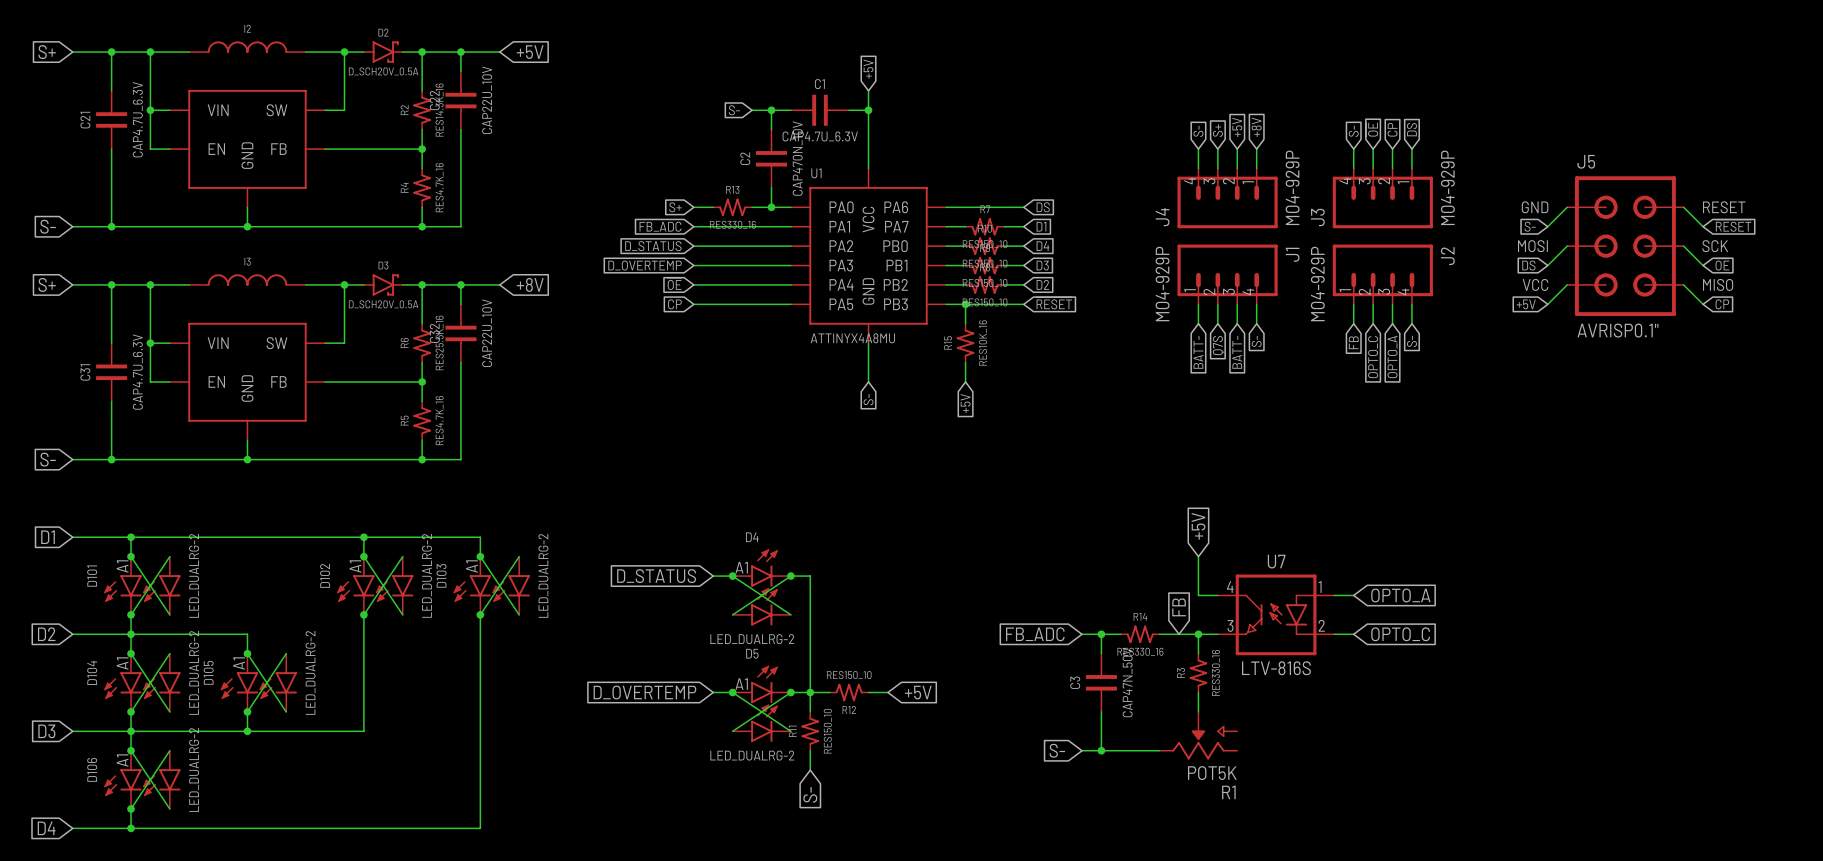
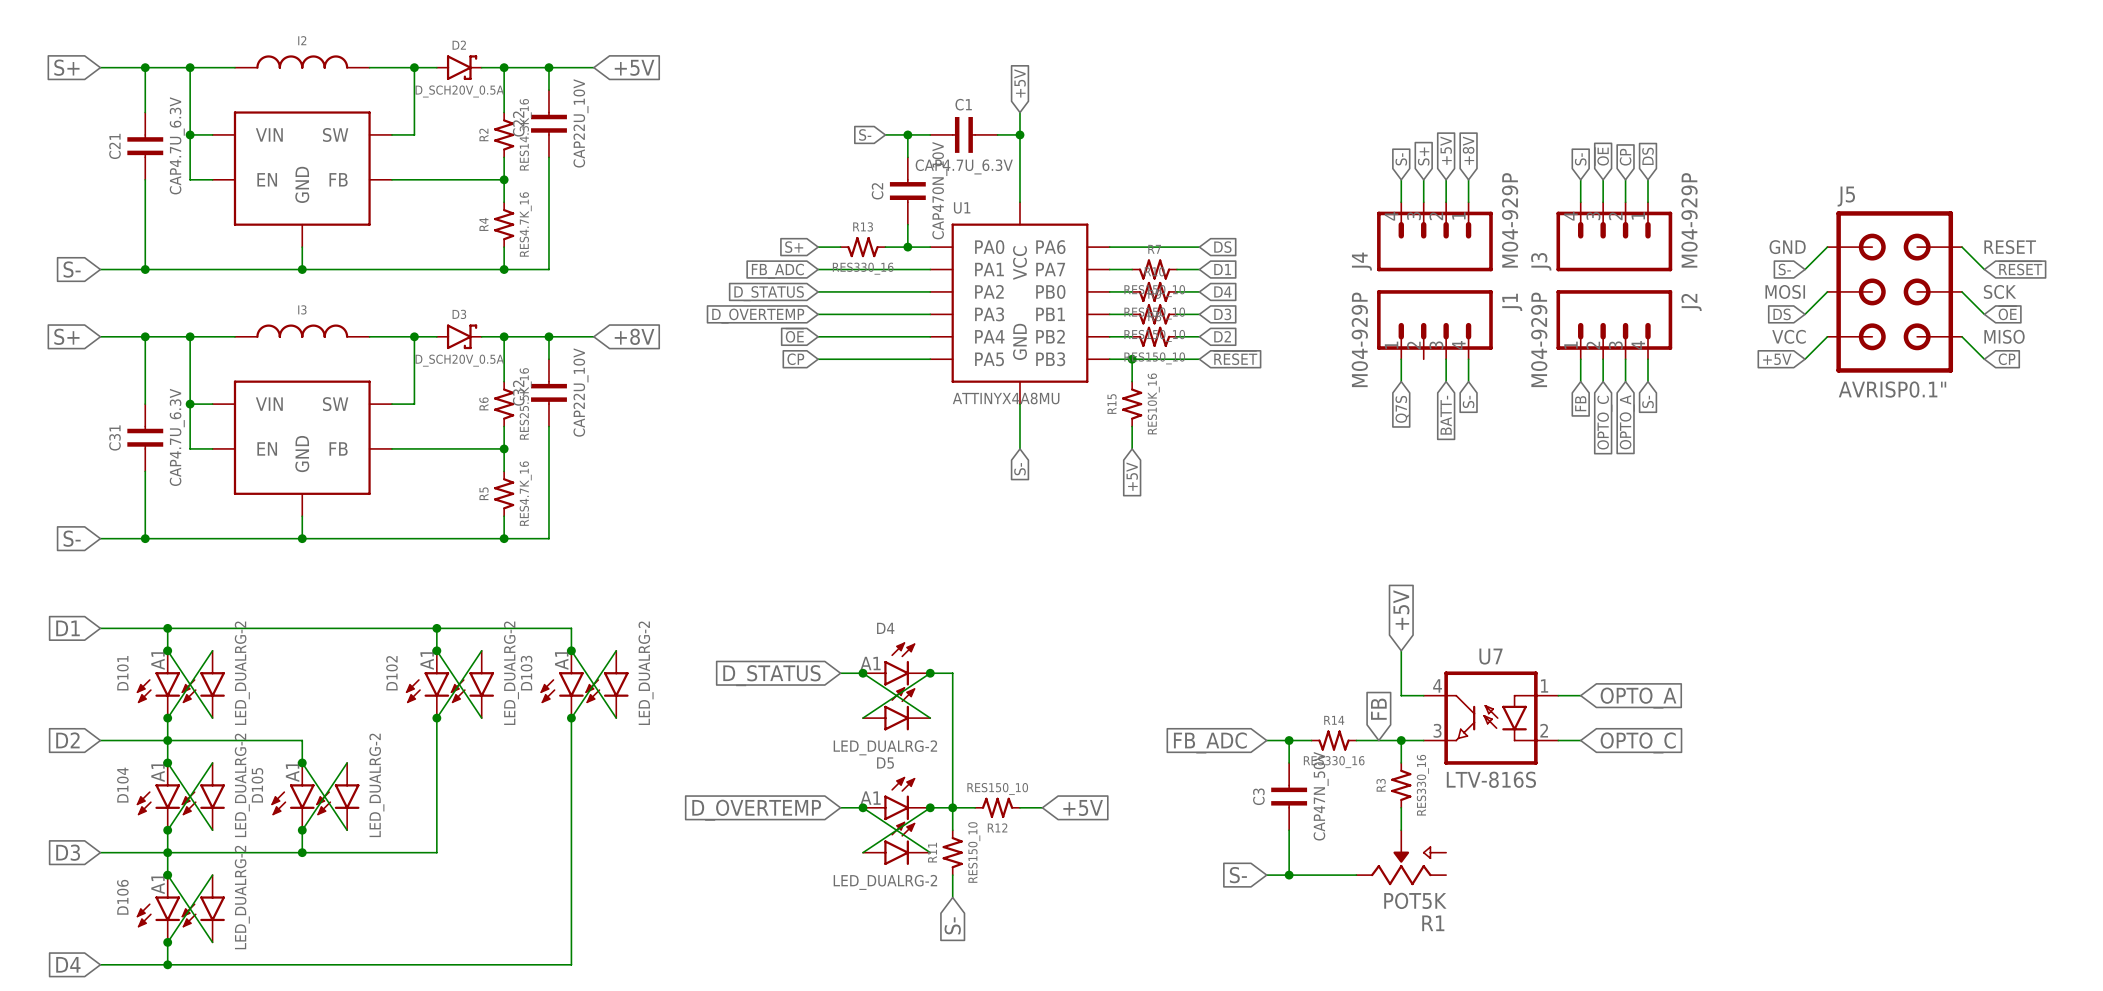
wire: (1217, 304) (1217, 323) -> none
global label: Q7S (1218, 345) -> none
global label: BATT- (1198, 352) -> Q7S (1402, 409)

